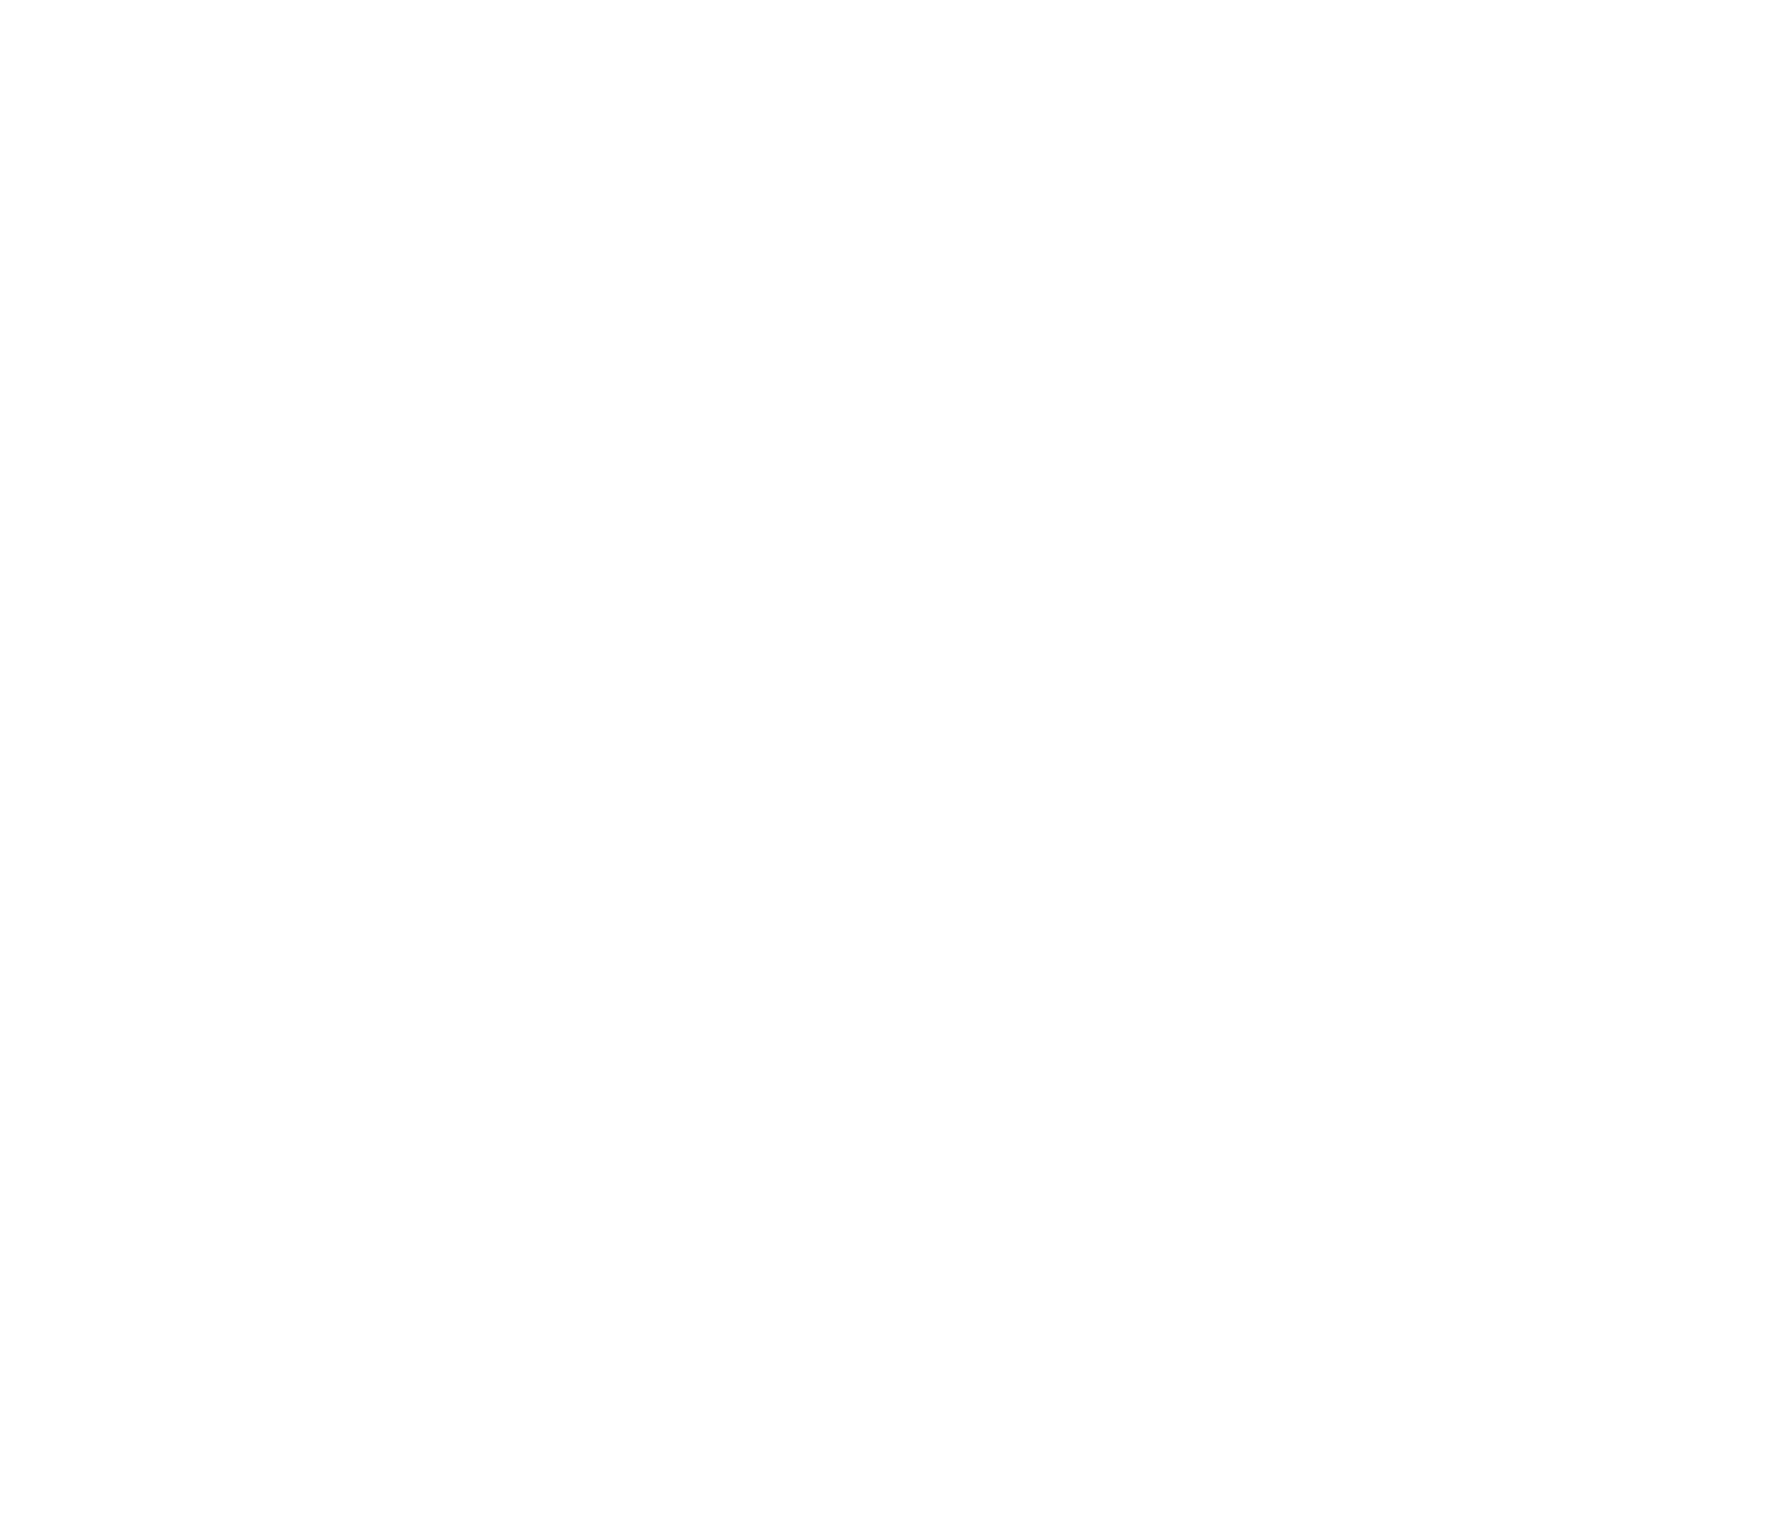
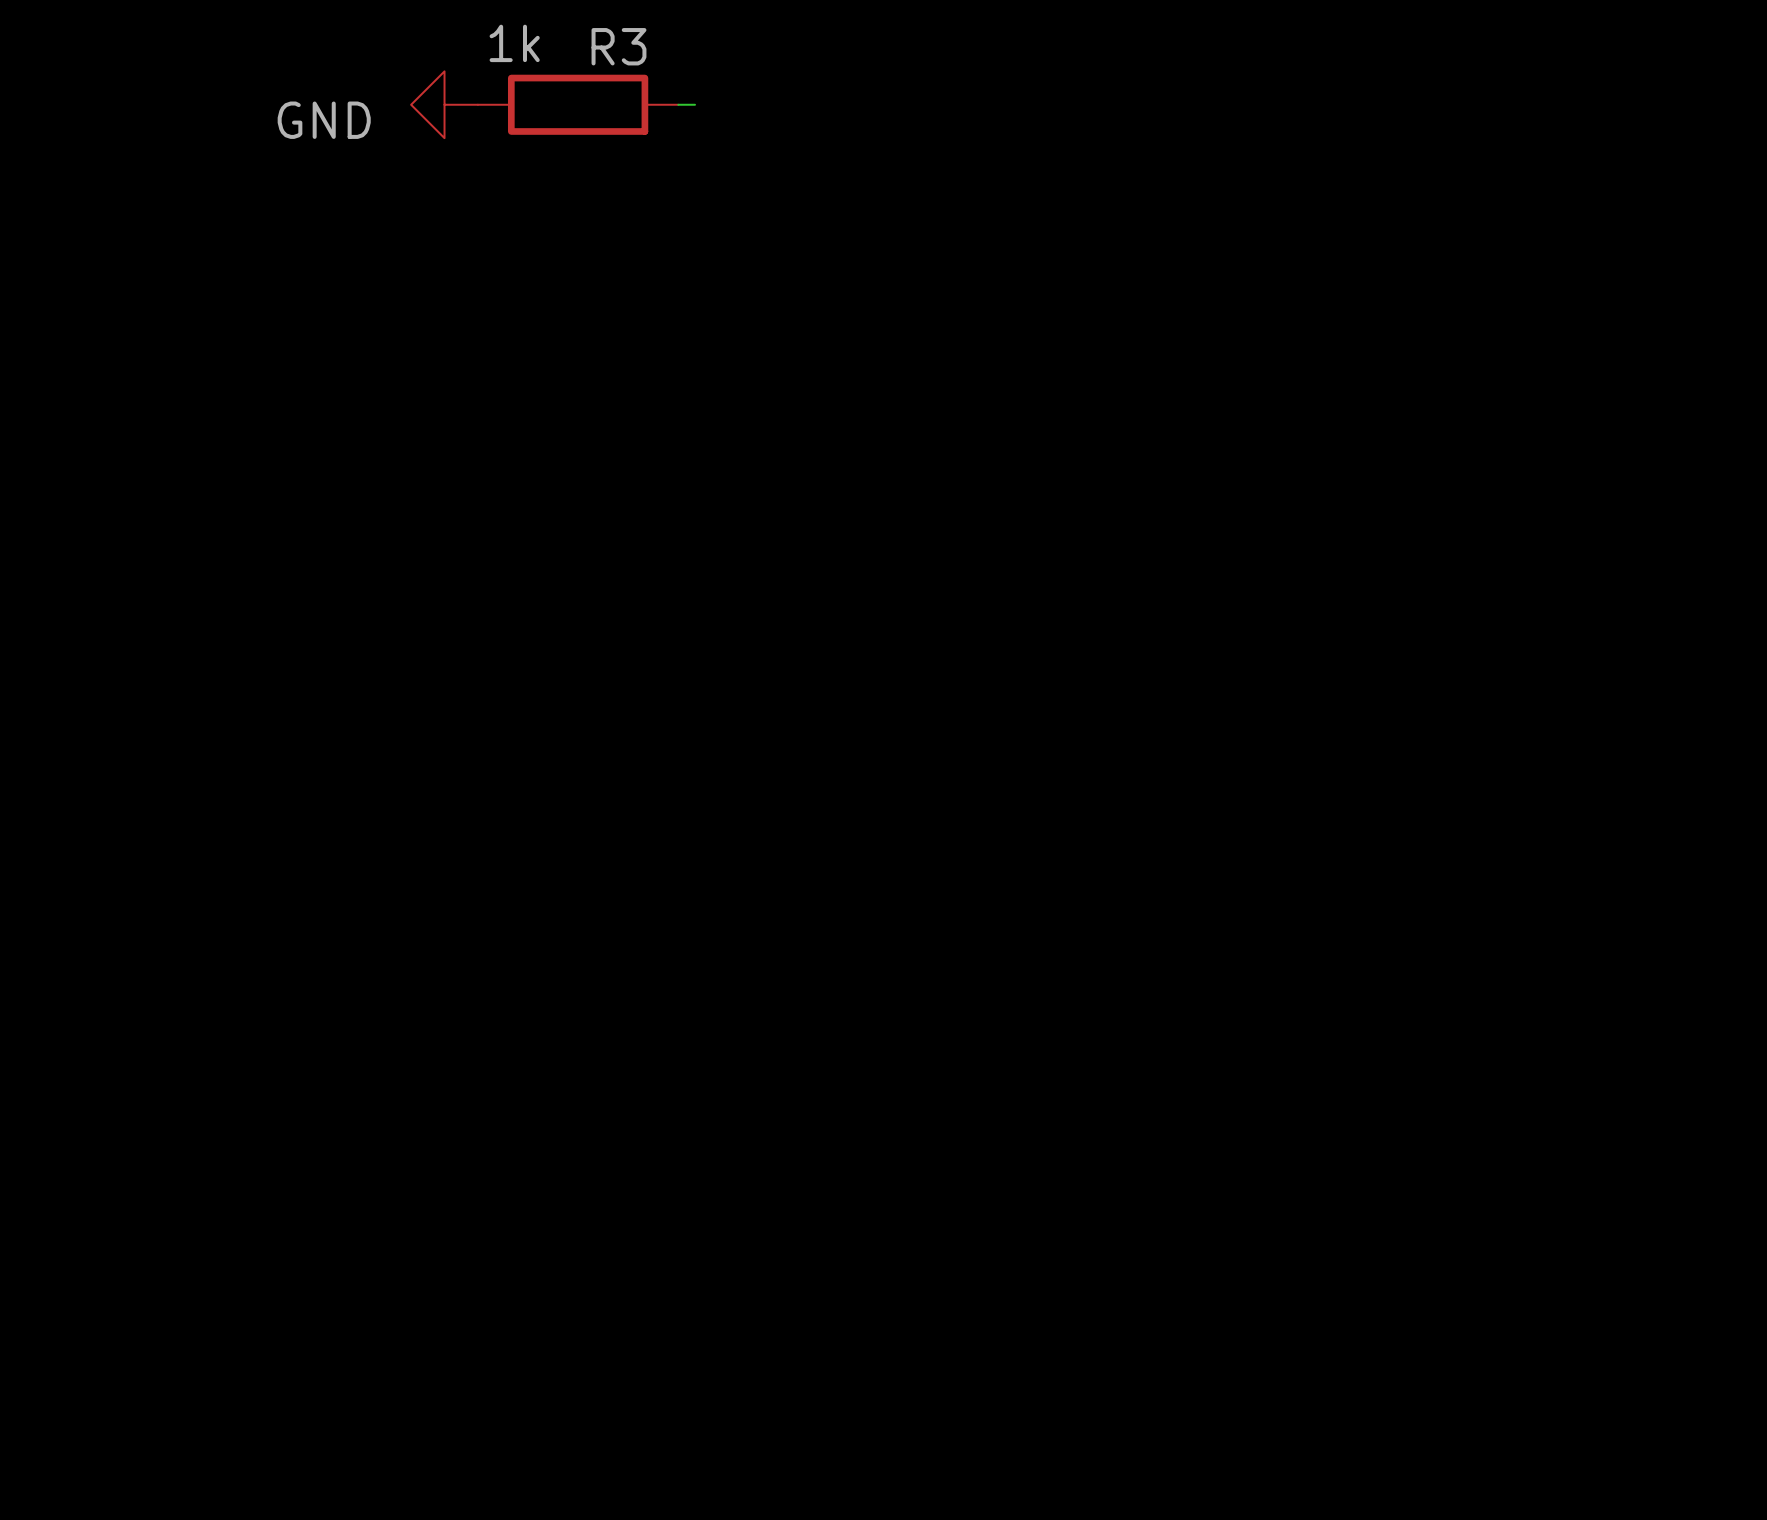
power symbol: none -> GND (444, 104)
R3: none -> 1k (578, 104)
wire: none -> (678, 104) (695, 104)

